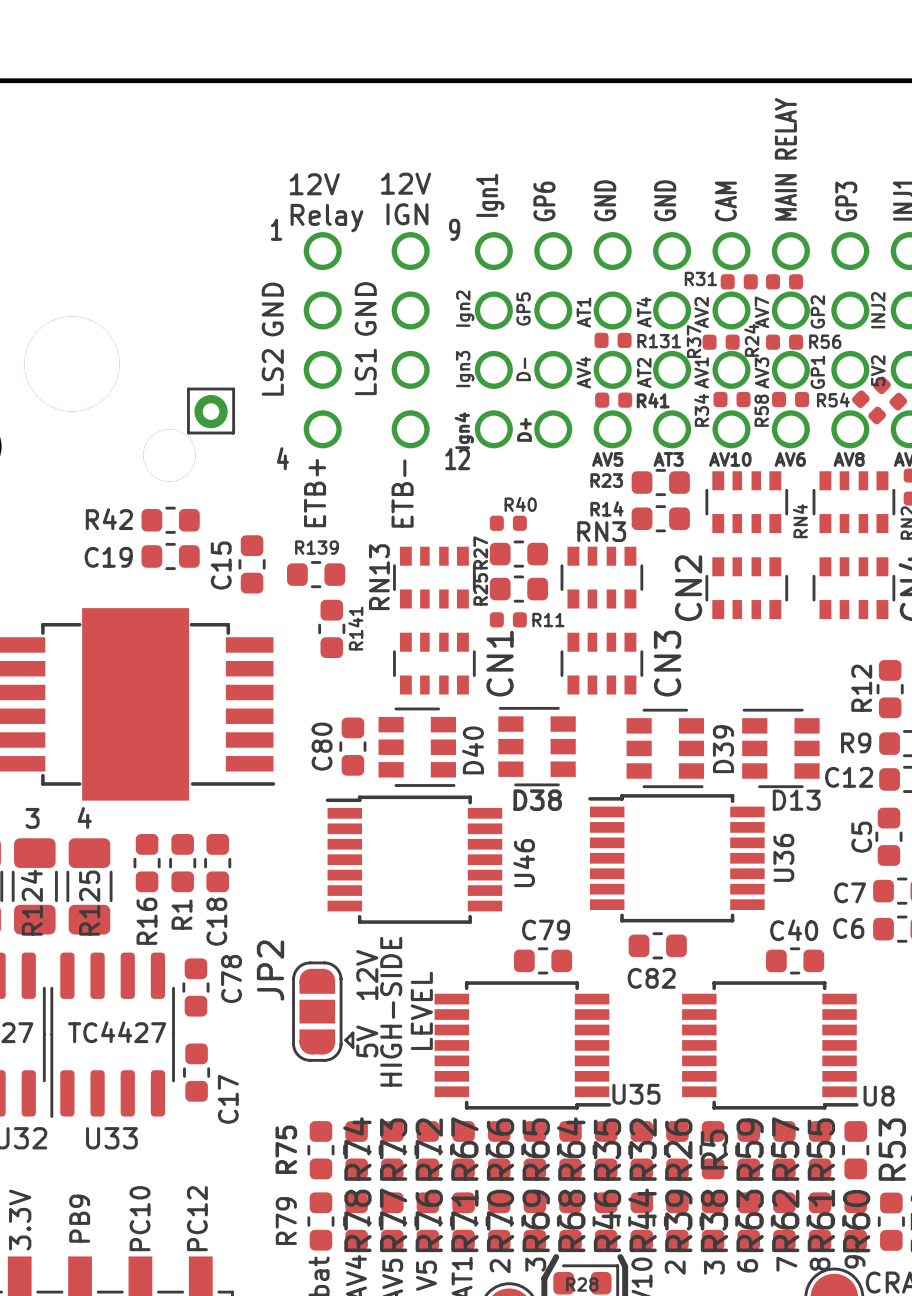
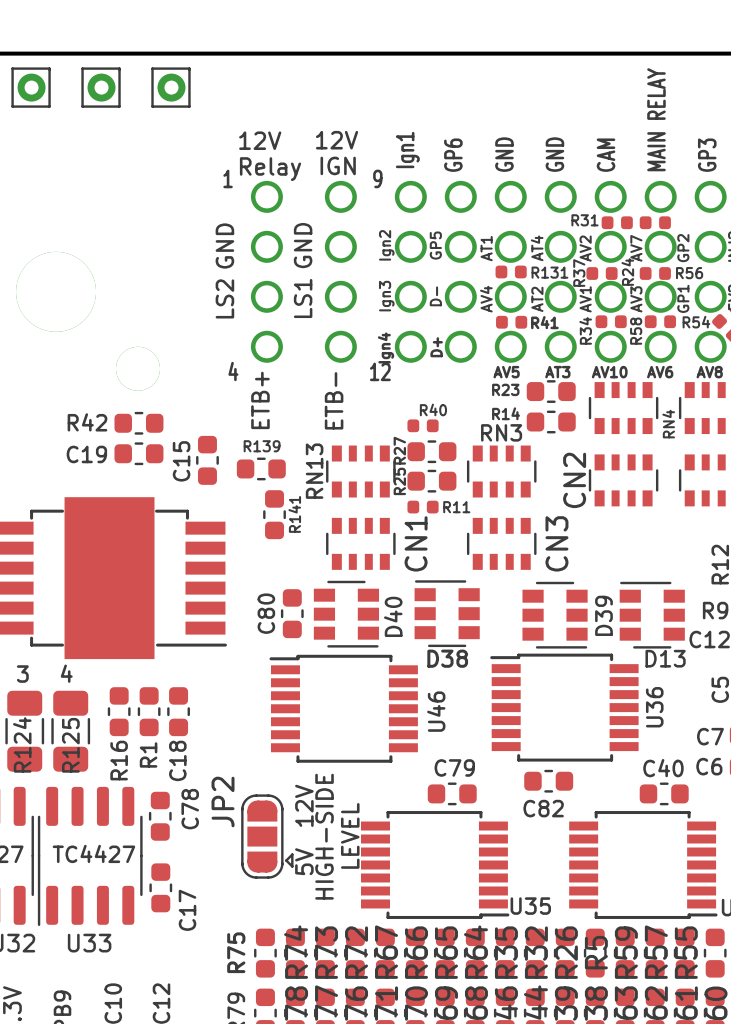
part: none -> (31, 87)
part: none -> (101, 87)
part: none -> (170, 87)
part: (211, 411) -> none

